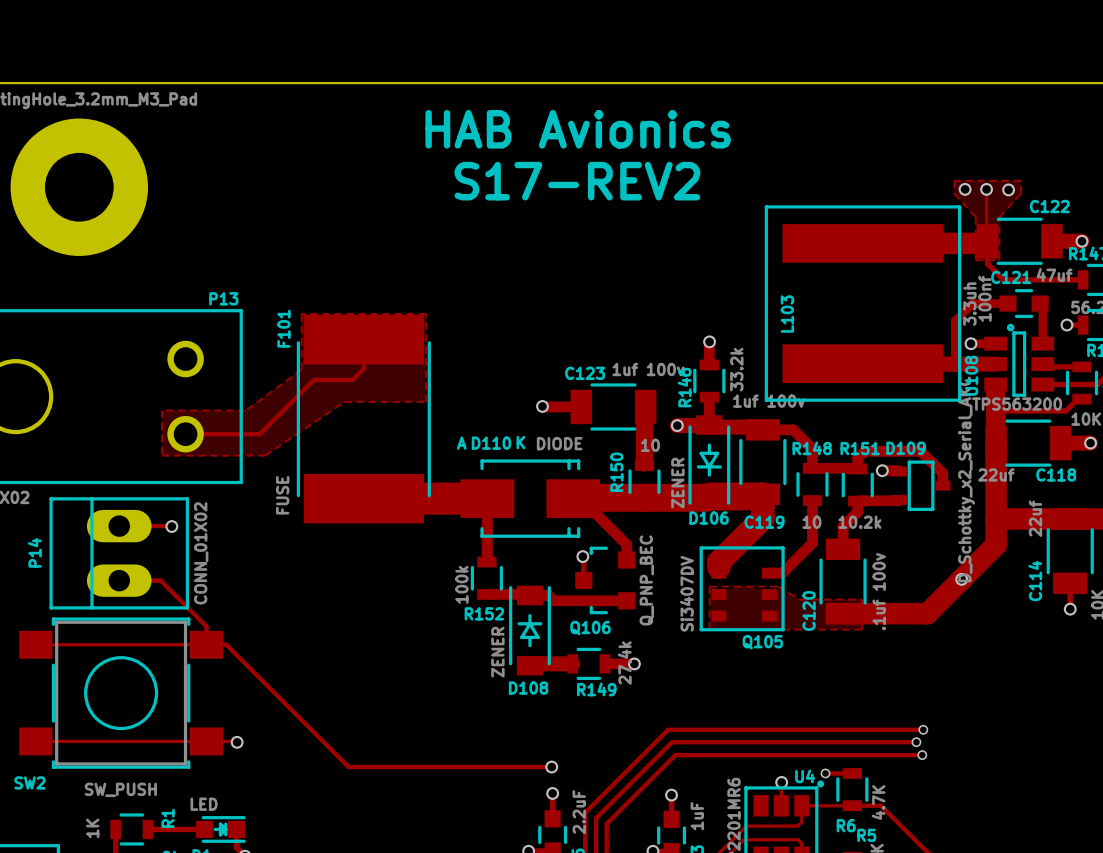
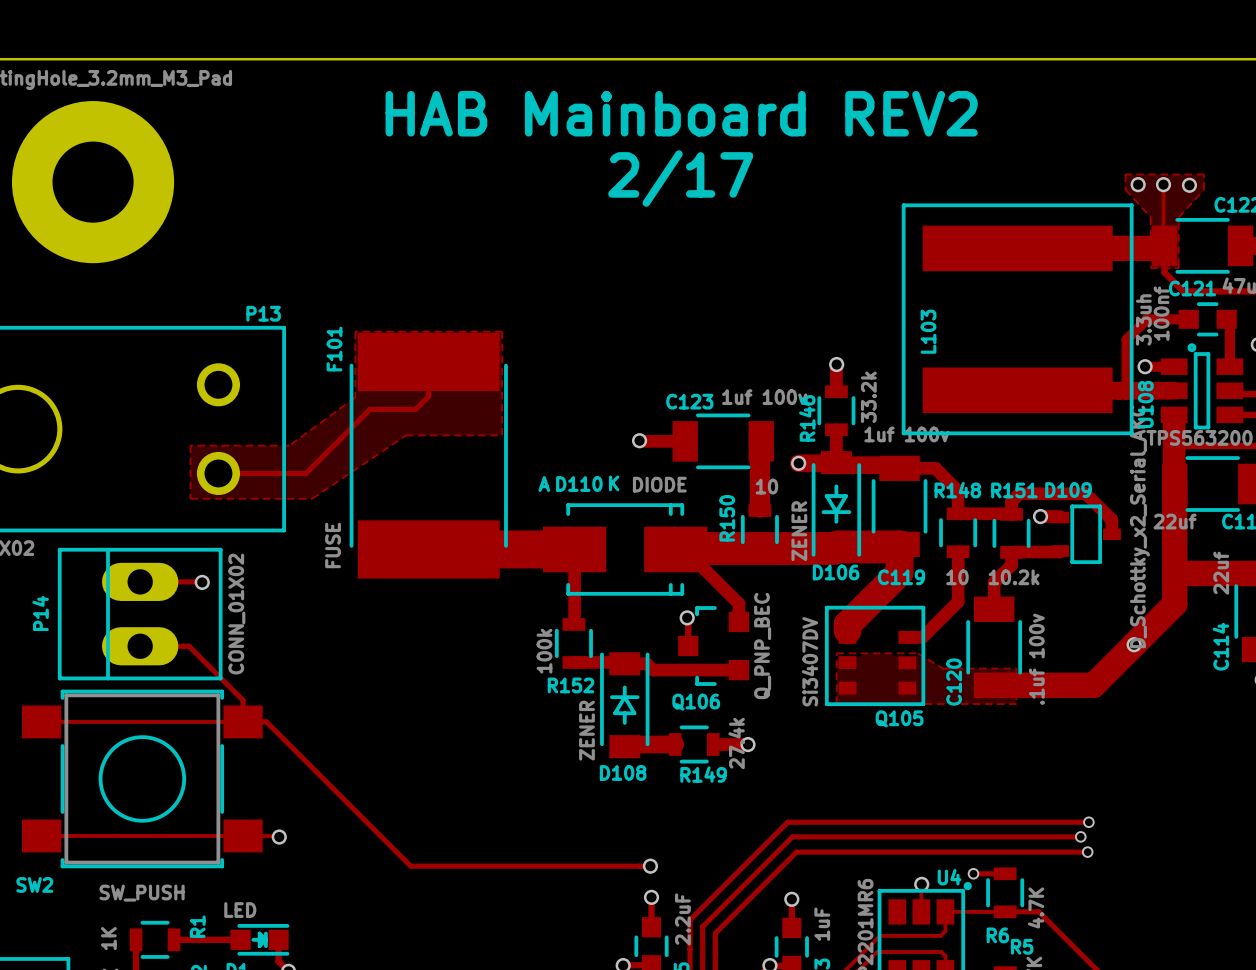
text: HAB Avionics (578, 129) -> HAB Mainboard REV2 (681, 113)
text: S17-REV2 (577, 181) -> 2/17 (680, 178)

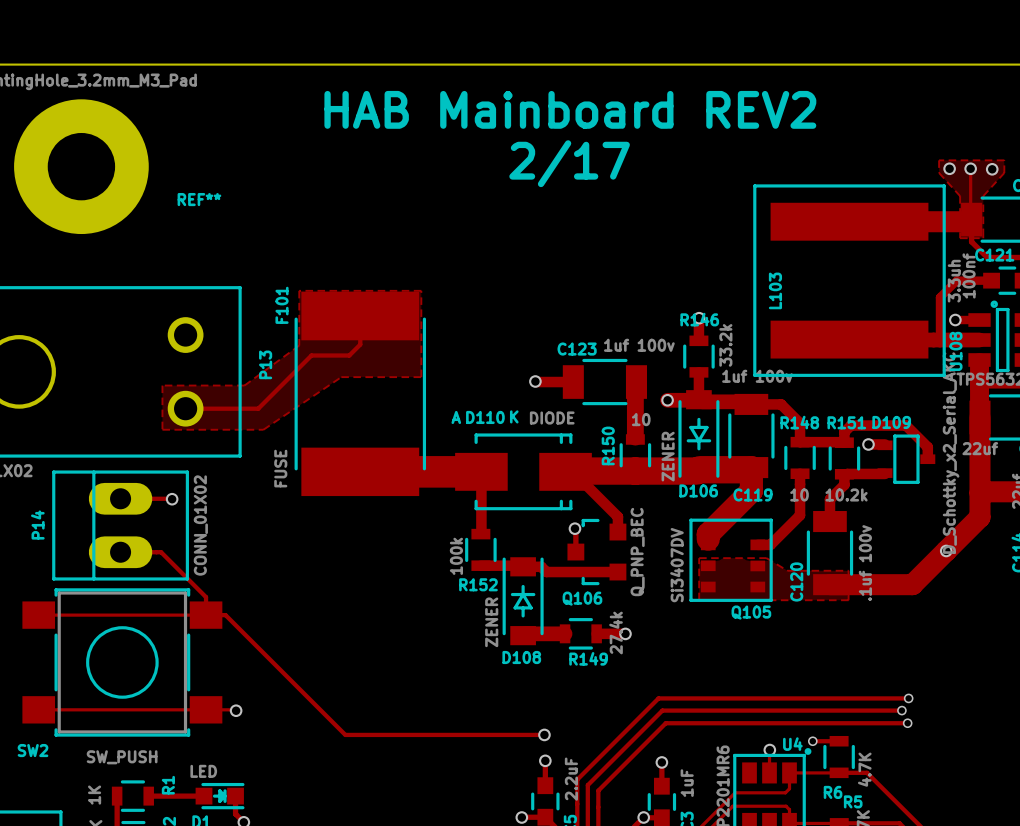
REF** name: none -> REF** (199, 199)
P13 name rotation: 0° (263, 313) -> 90° counterclockwise (265, 364)
P13 name position: P13 (263, 313) -> P13 (265, 364)
R146 name rotation: 0° (807, 418) -> 90° clockwise (699, 319)
R146 name position: R146 (807, 418) -> R146 (699, 319)

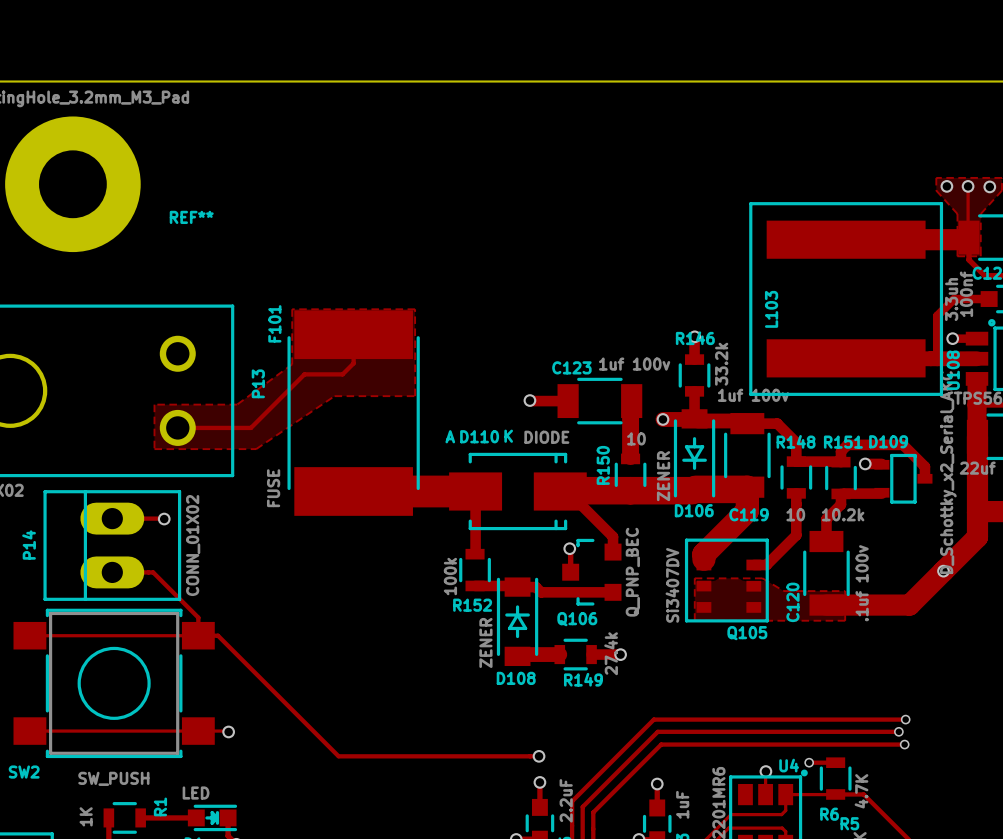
text: HAB Mainboard REV2 (570, 109) -> none
text: 2/17 (569, 163) -> none

